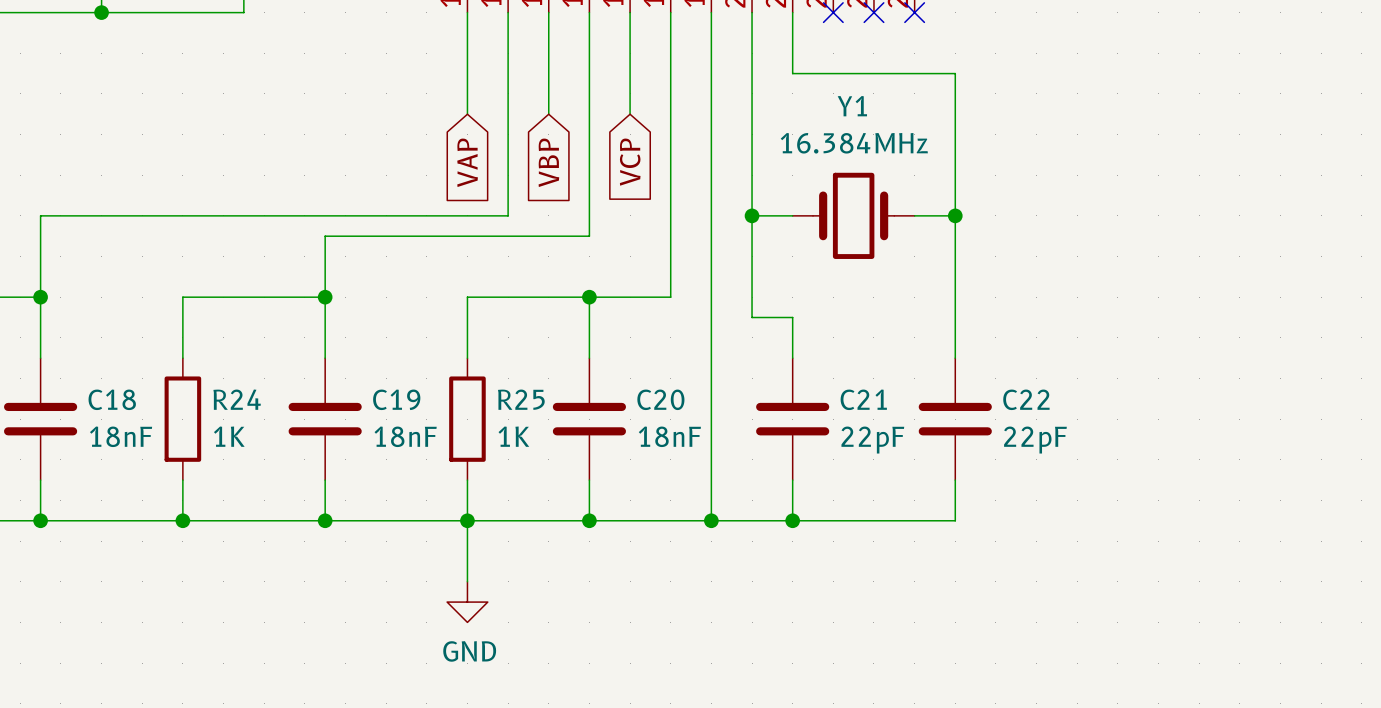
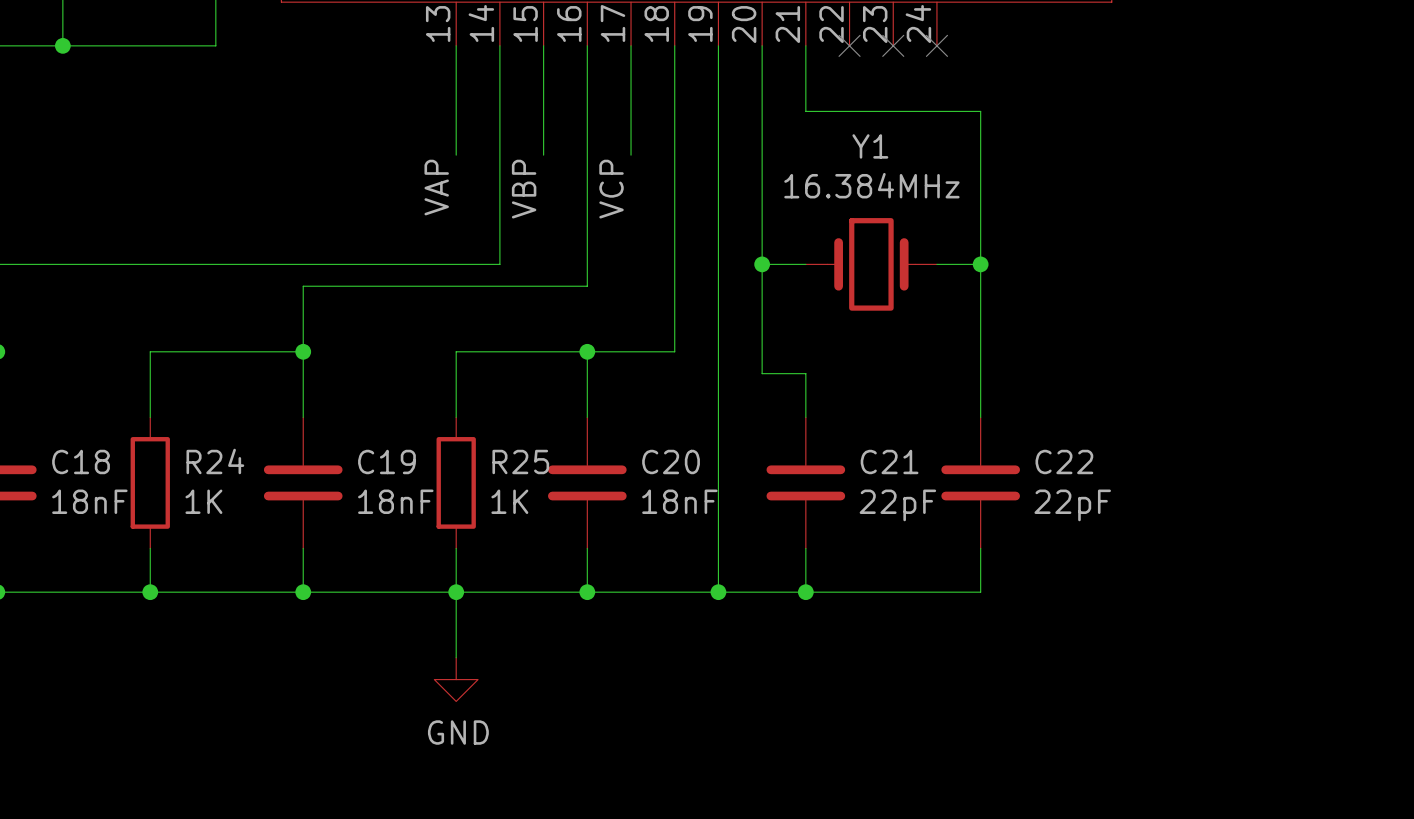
label: none -> VAP (436, 187)
label: none -> VBP (524, 189)
label: none -> VCP (611, 189)
global label: VAP (467, 162) -> none
global label: VBP (548, 162) -> none
global label: VCP (630, 162) -> none

